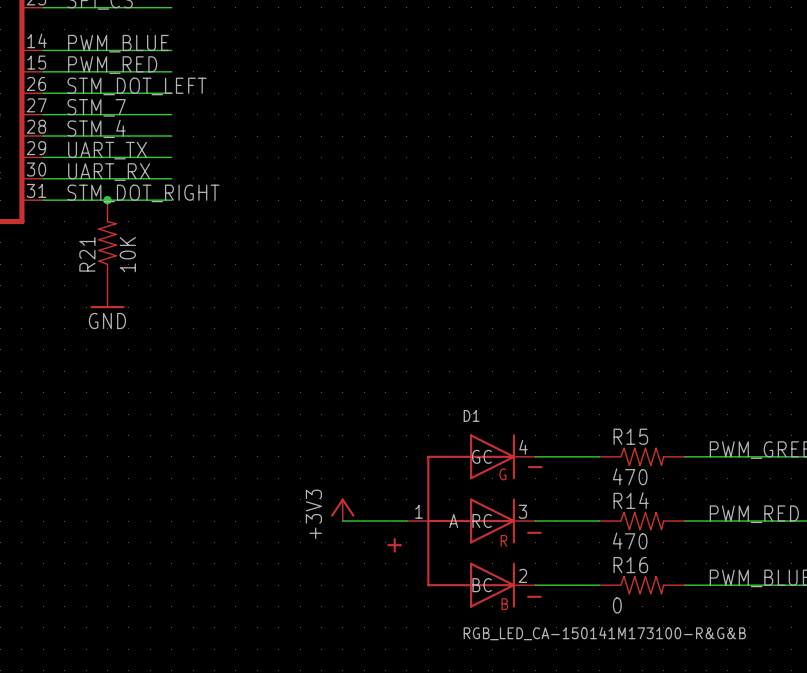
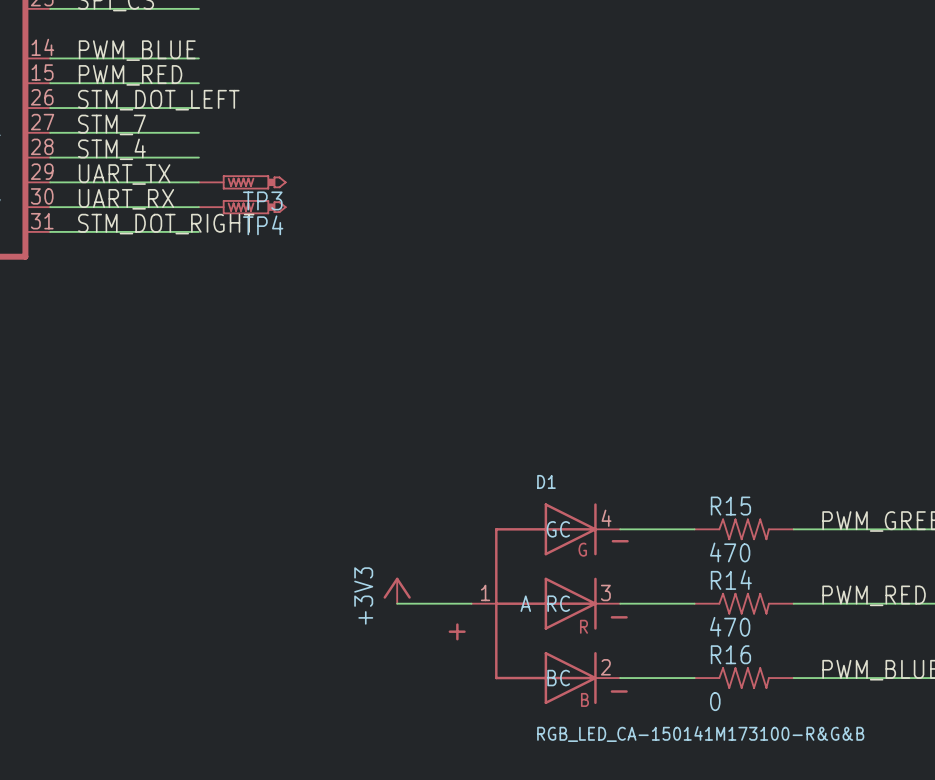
TP3: none -> (242, 182)
TP4: none -> (242, 207)
junction: (107, 200) -> none
R21: 10K (107, 242) -> none
power symbol: GND (107, 296) -> none

